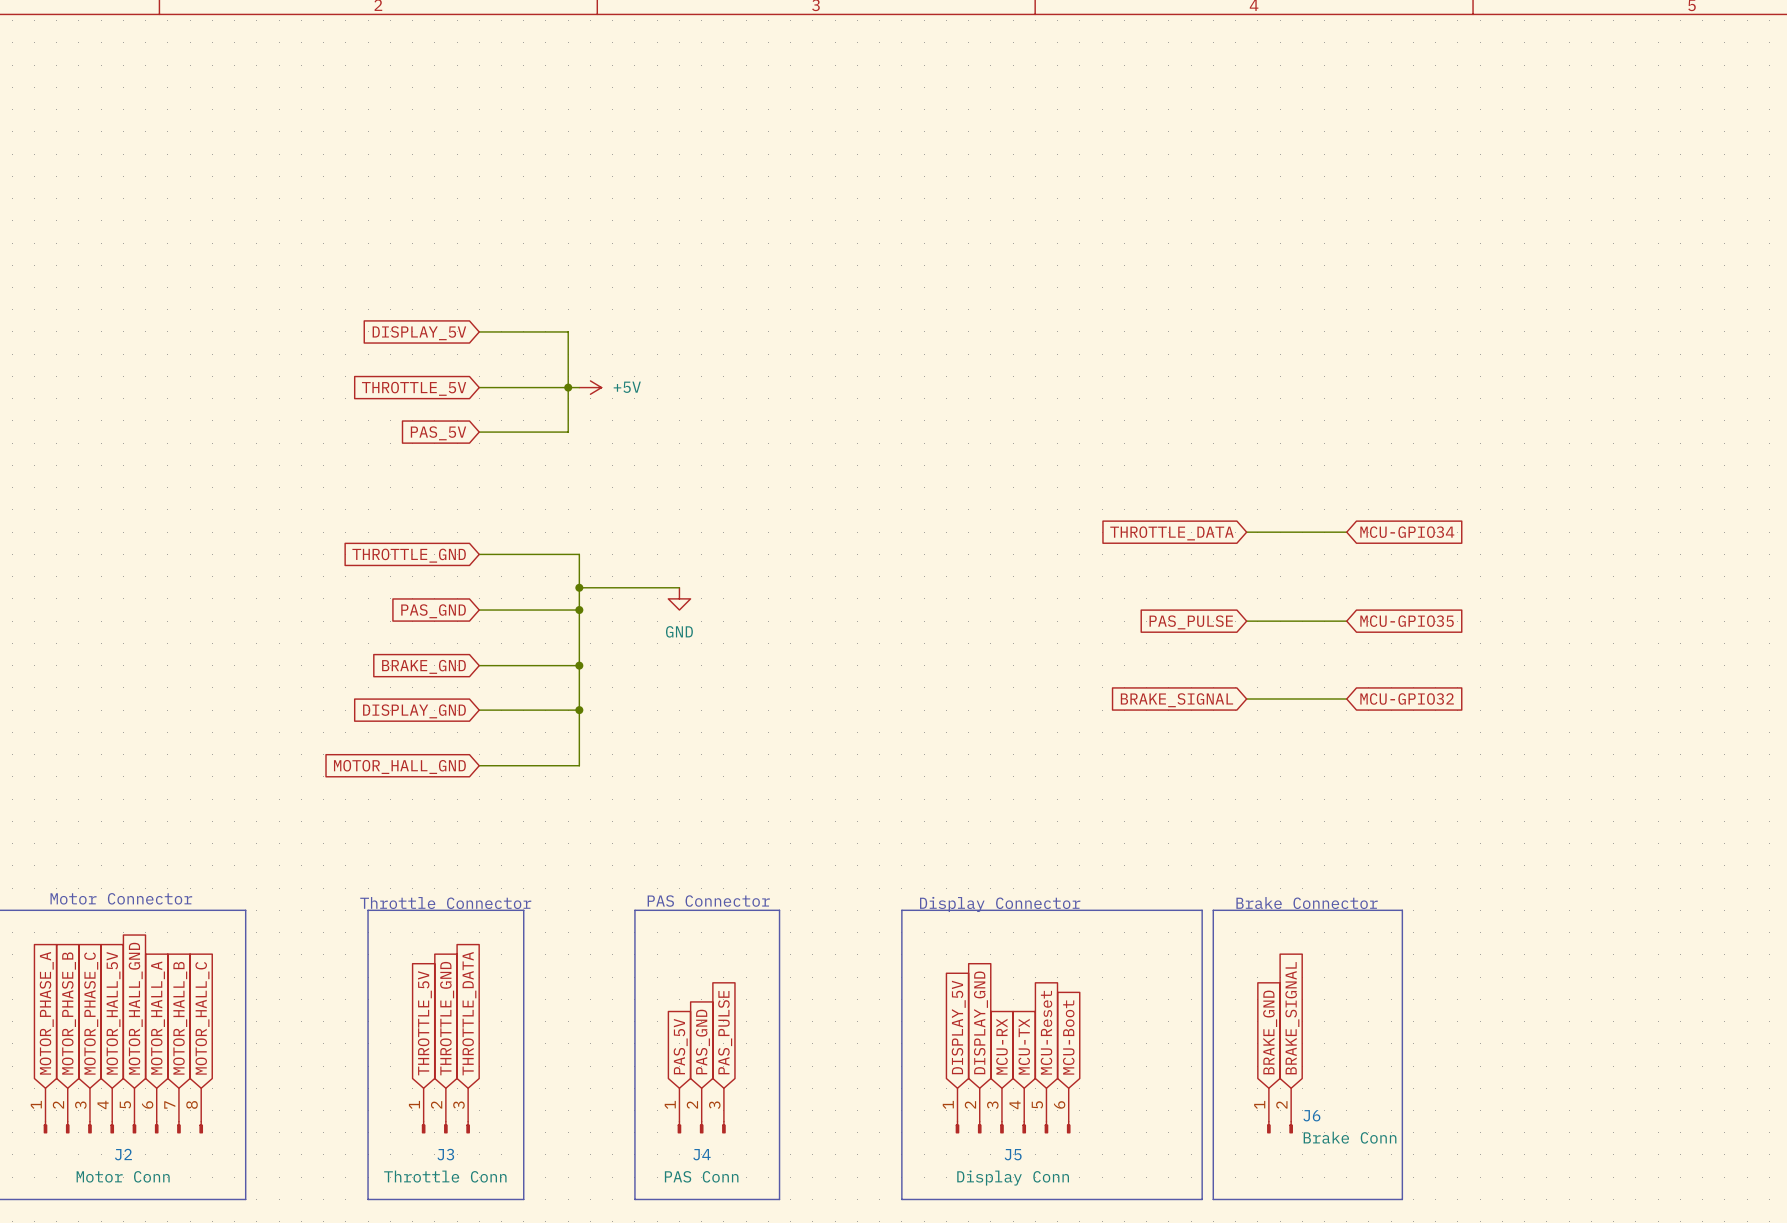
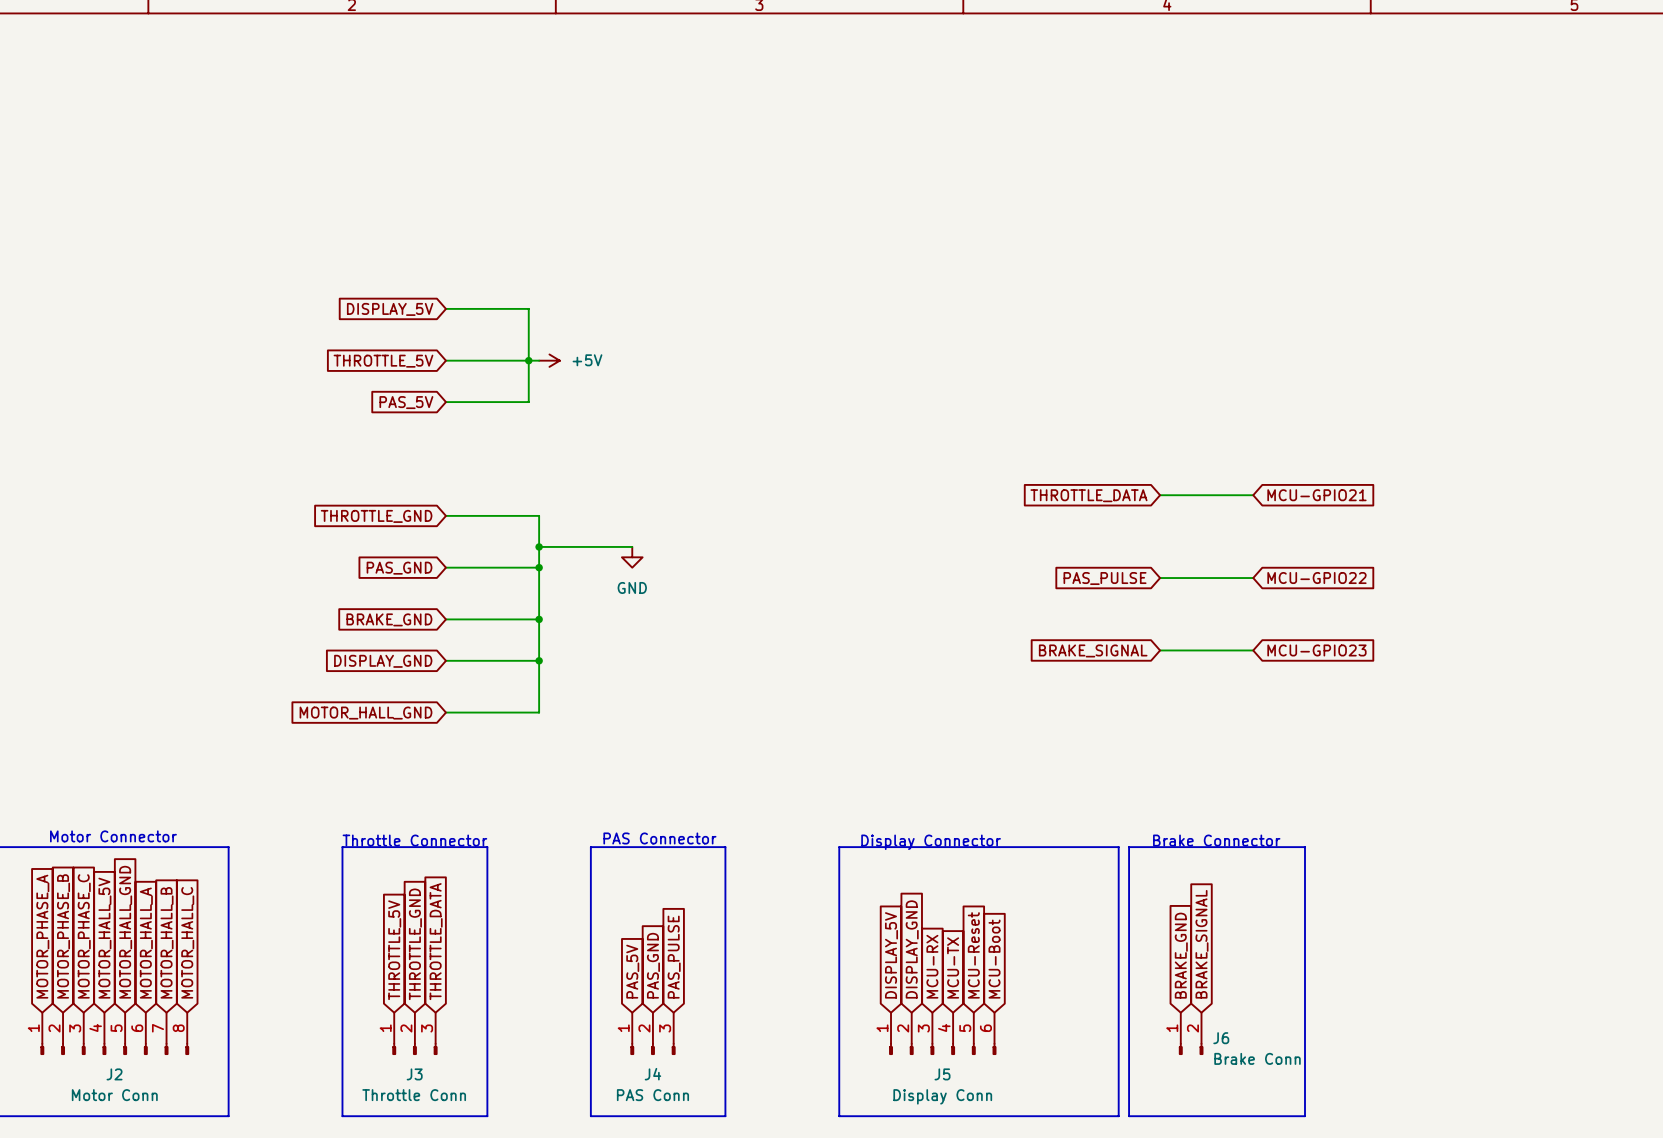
global label: MCU-GPIO34 (1407, 532) -> MCU-GPIO21 (1316, 495)
global label: MCU-GPIO35 (1407, 621) -> MCU-GPIO22 (1316, 578)
global label: MCU-GPIO32 (1407, 698) -> MCU-GPIO23 (1316, 650)

